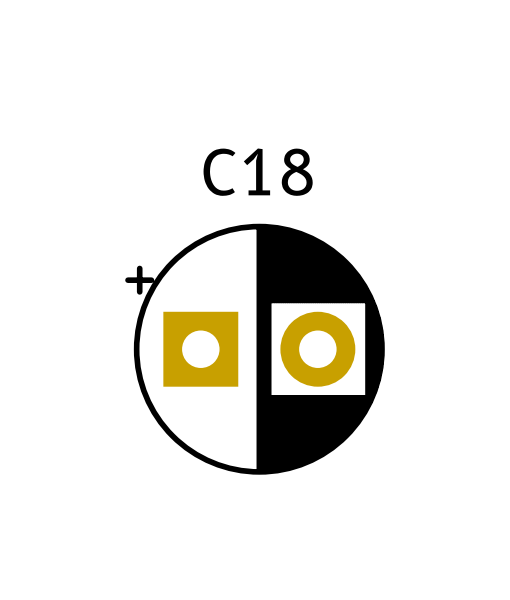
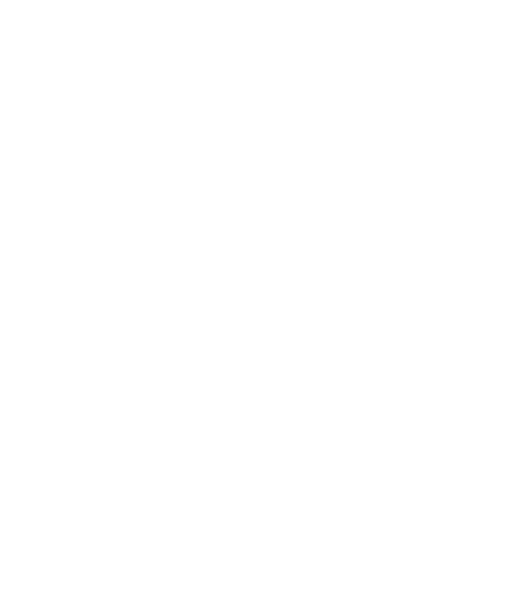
C18: (255, 349) -> none

